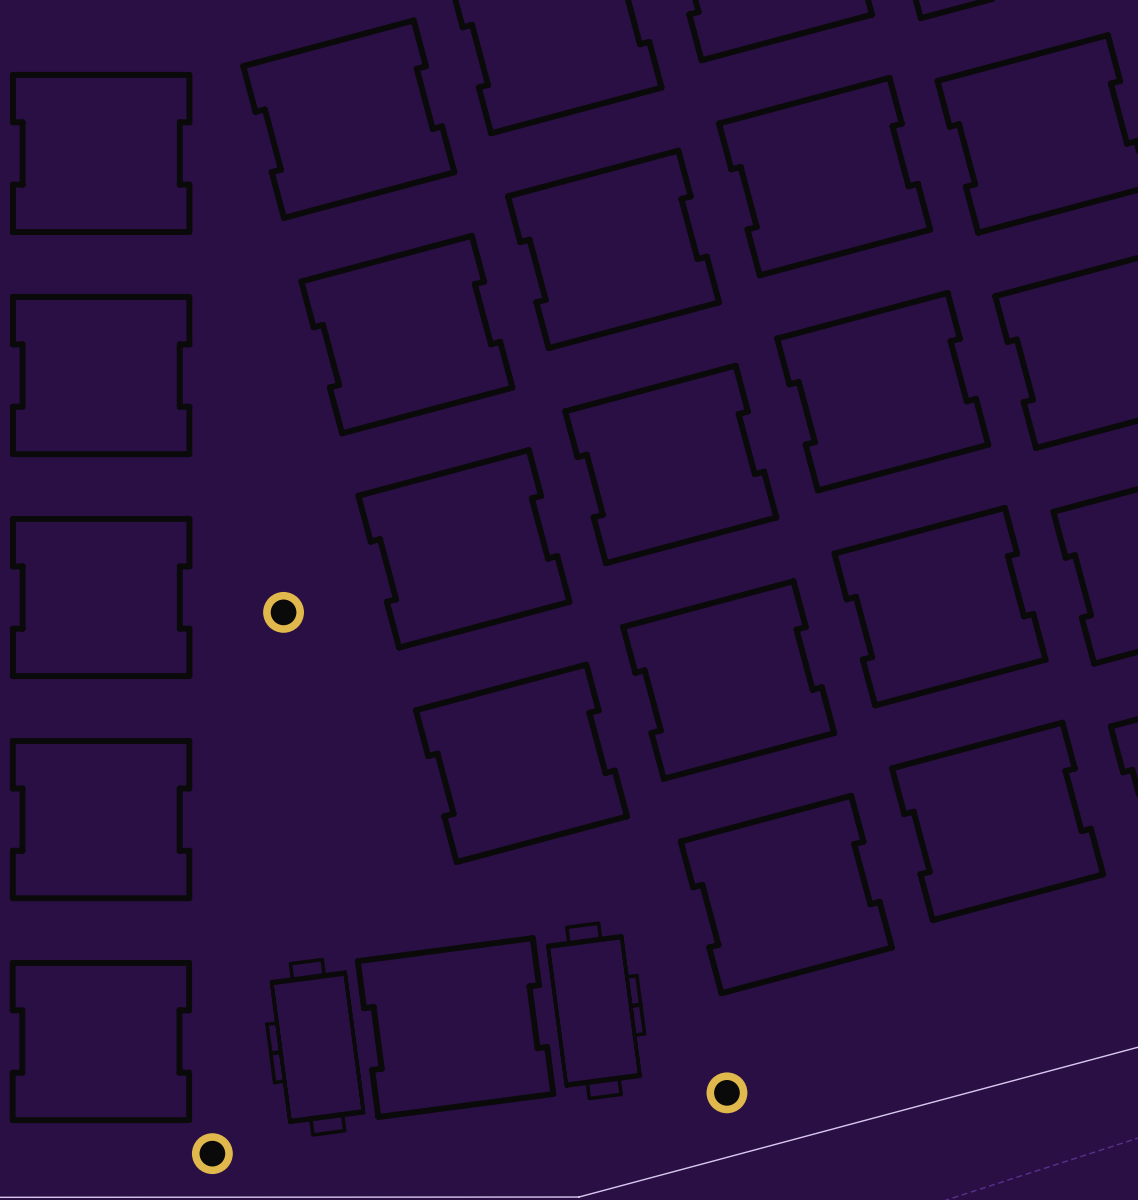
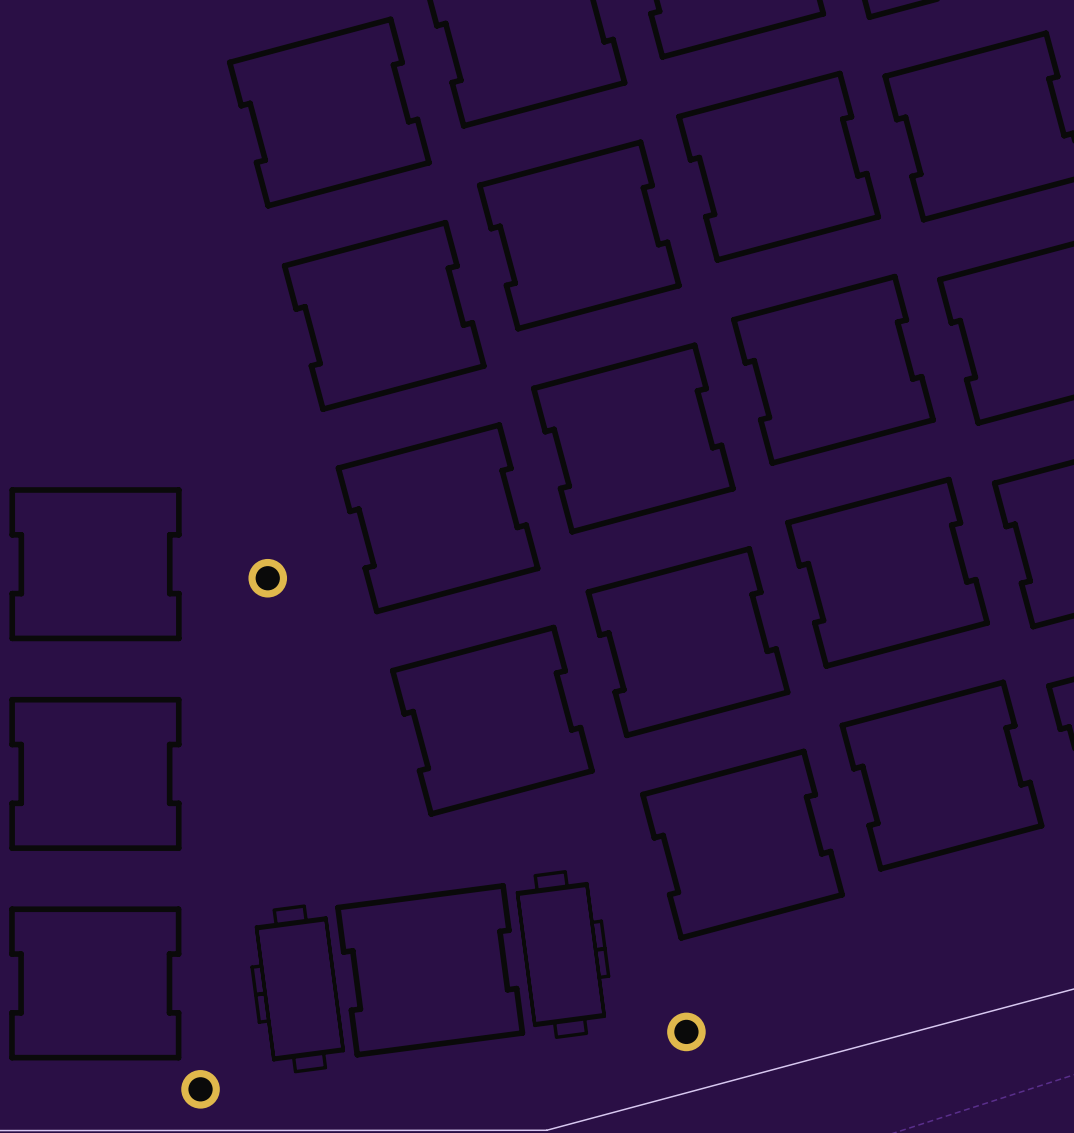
part: (101, 153) -> none
part: (101, 375) -> none

